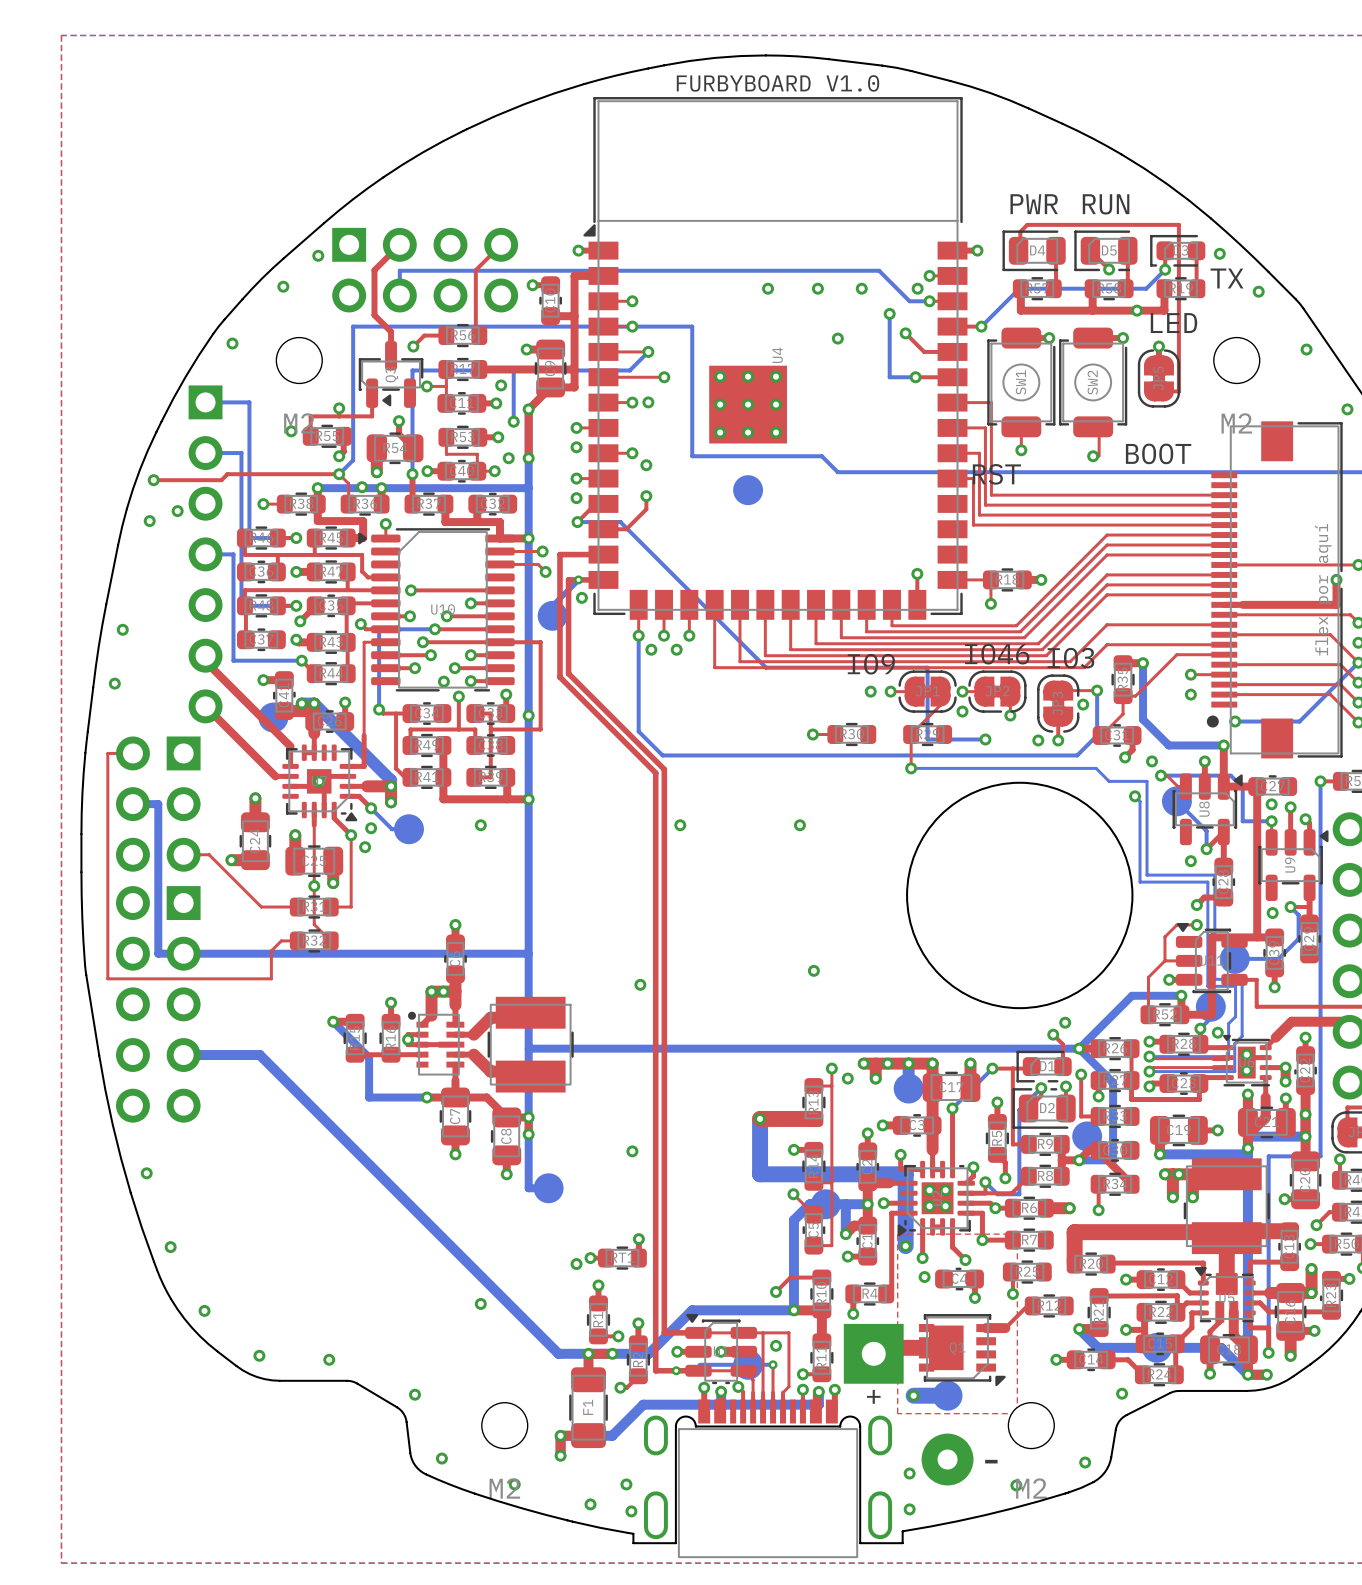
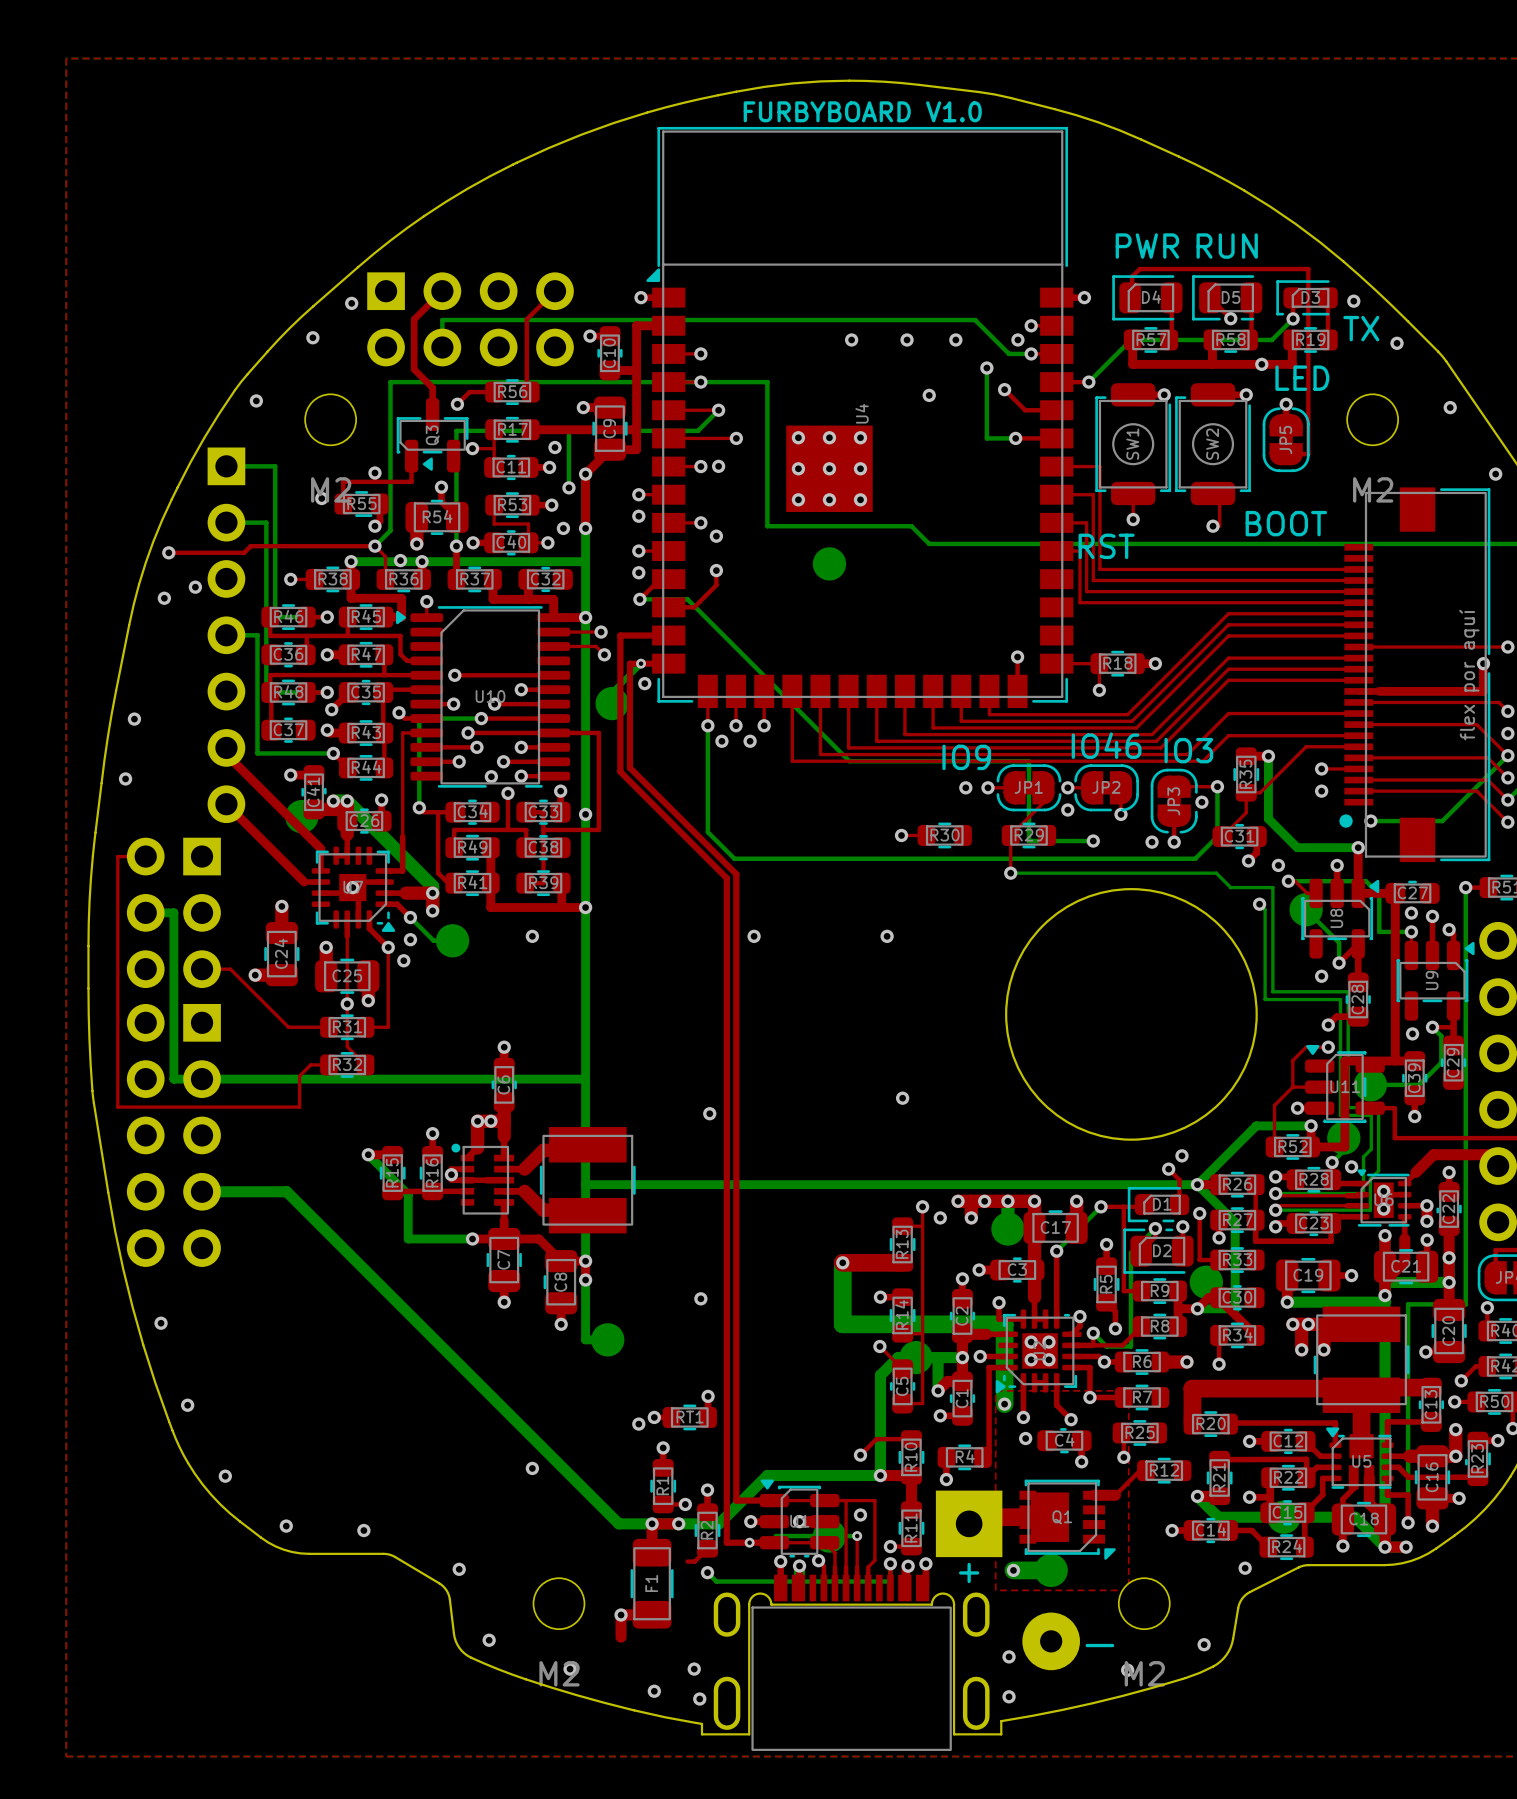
via position: (620, 1387) -> (707, 1572)
bottom track: none -> (890, 1564) (890, 1581) (716, 1581) (707, 1572)
bottom track: (818, 1391) (818, 1404) (643, 1404) (612, 1435) (560, 1435) (560, 1455) -> none
via: (560, 1455) -> none

